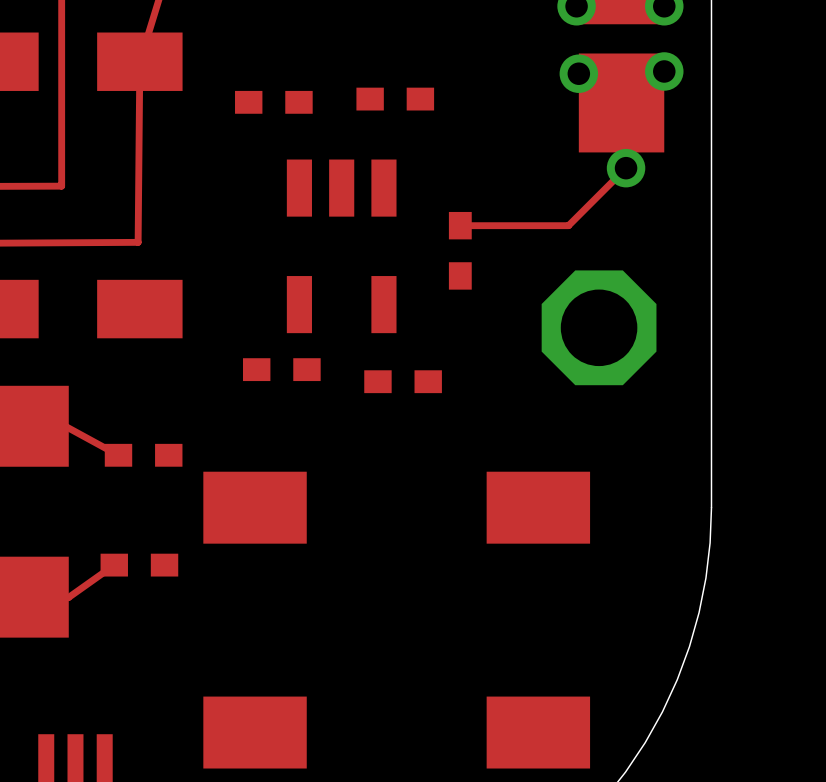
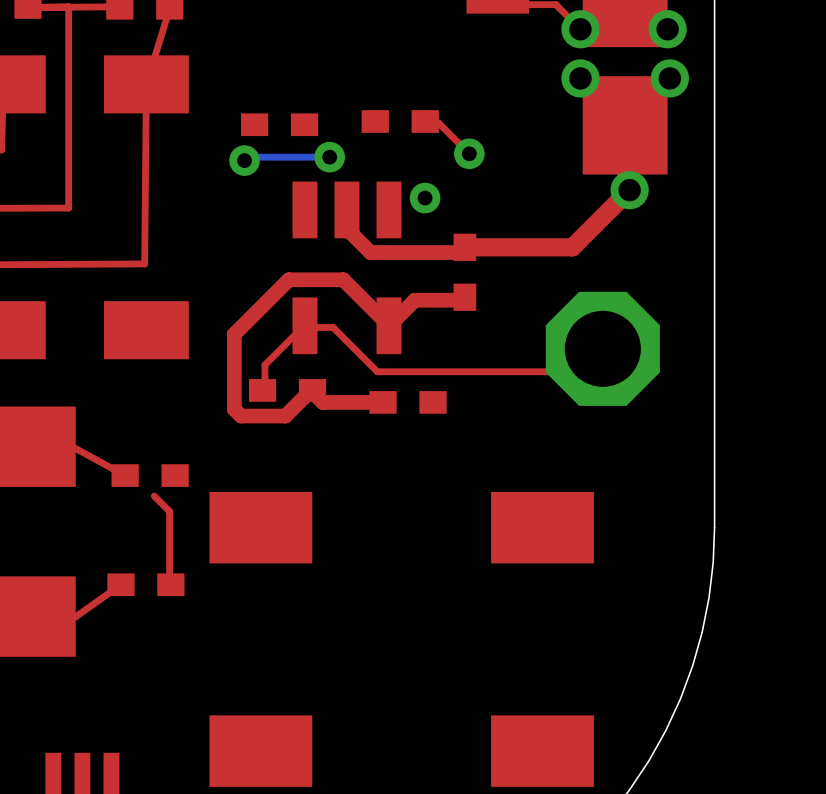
via position: (664, 71) -> (669, 78)
via position: (578, 73) -> (580, 78)
top track: none -> (425, 121) (438, 123) (469, 153)
via: none -> (469, 153)
bottom track: none -> (329, 157) (247, 157) (244, 160)
via: none -> (329, 157)
via: none -> (244, 160)
top track width: thin (626, 168) (568, 225) (460, 225) -> thick (629, 190) (572, 247) (464, 247)
via: none -> (425, 198)
top track: none -> (347, 209) (350, 211) (350, 232) (370, 252) (459, 252) (464, 247)
top track: none -> (464, 297) (462, 300) (414, 300) (389, 325) (343, 279) (288, 279) (234, 334) (234, 409) (241, 416) (285, 416) (312, 390) (322, 402) (383, 402)
top track: none -> (602, 348) (581, 371) (377, 371) (333, 327) (305, 327) (304, 325) (264, 364) (264, 388) (262, 390)
top track: none -> (154, 496) (169, 511) (170, 584)

